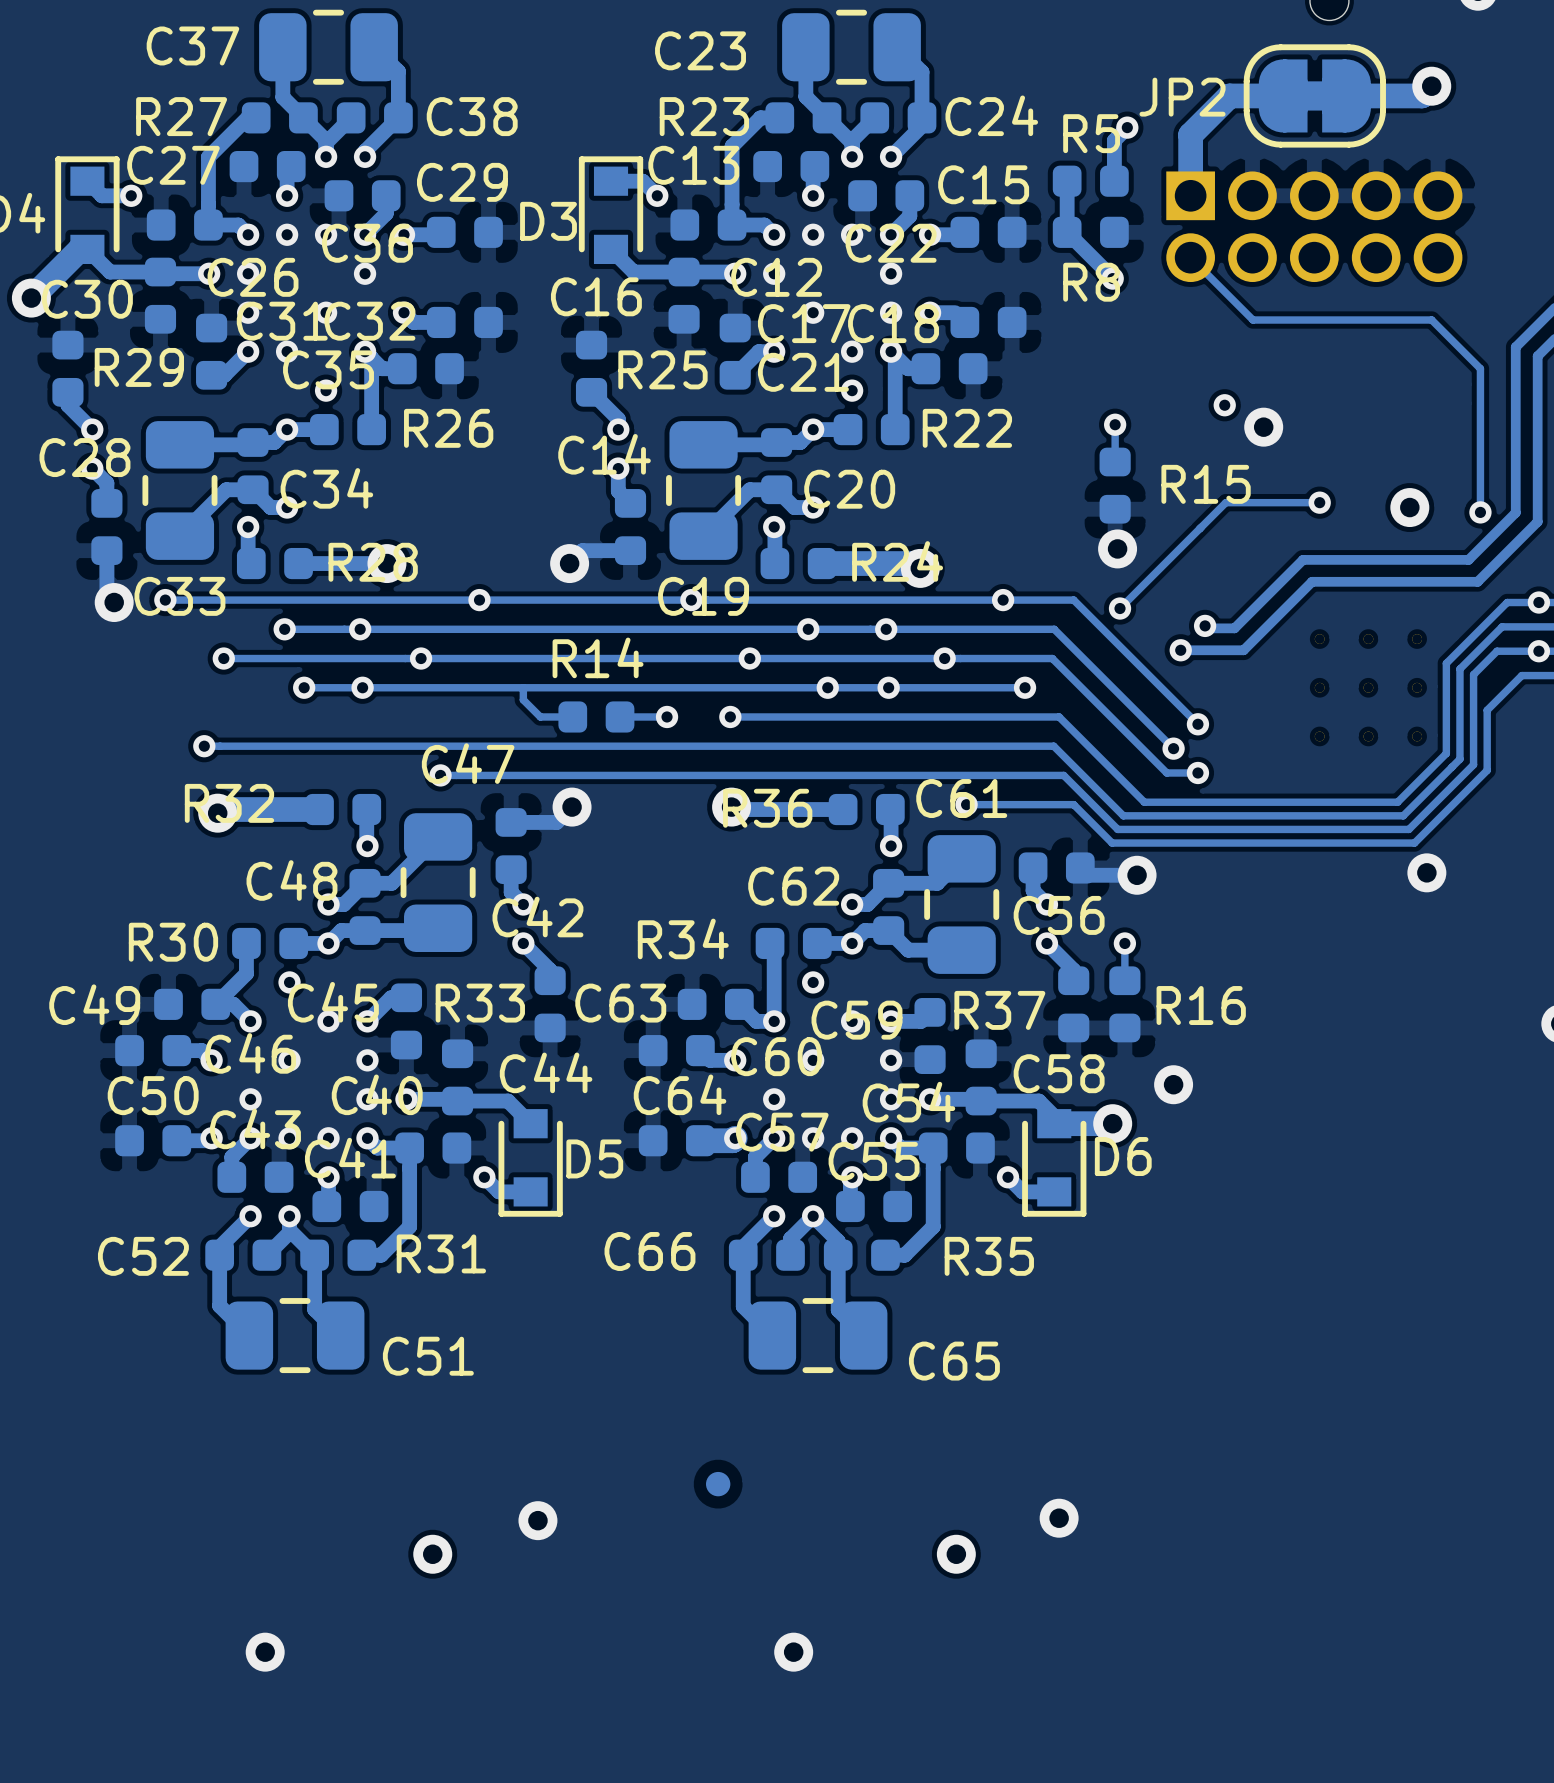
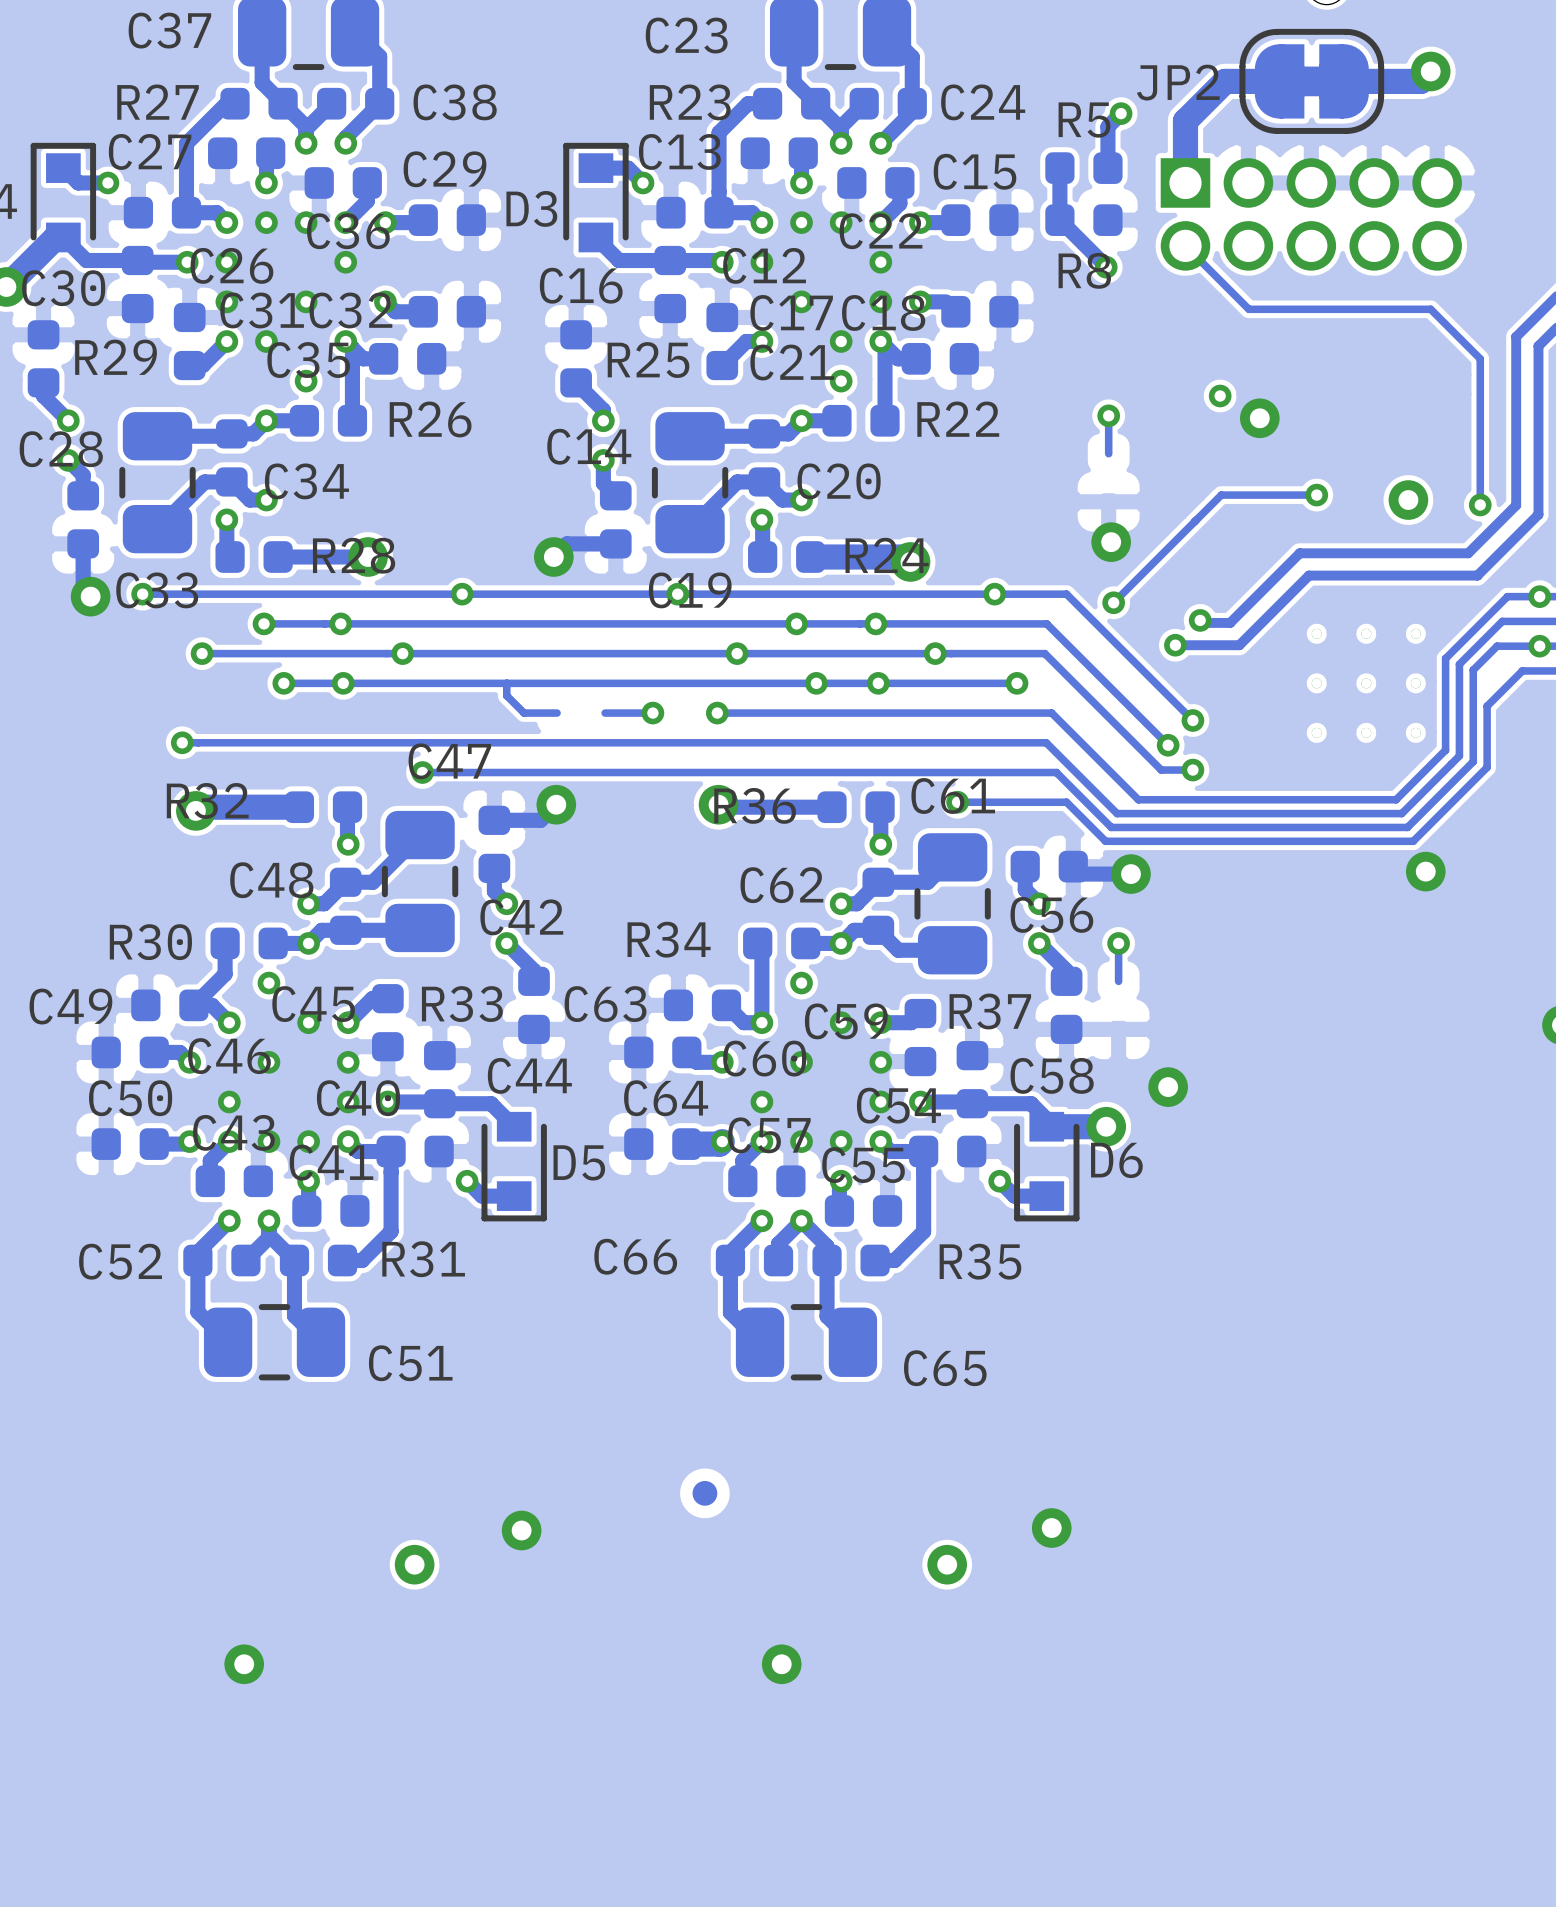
R15: (1115, 485) -> none
R14: (596, 716) -> none
R16: (1124, 1004) -> none

